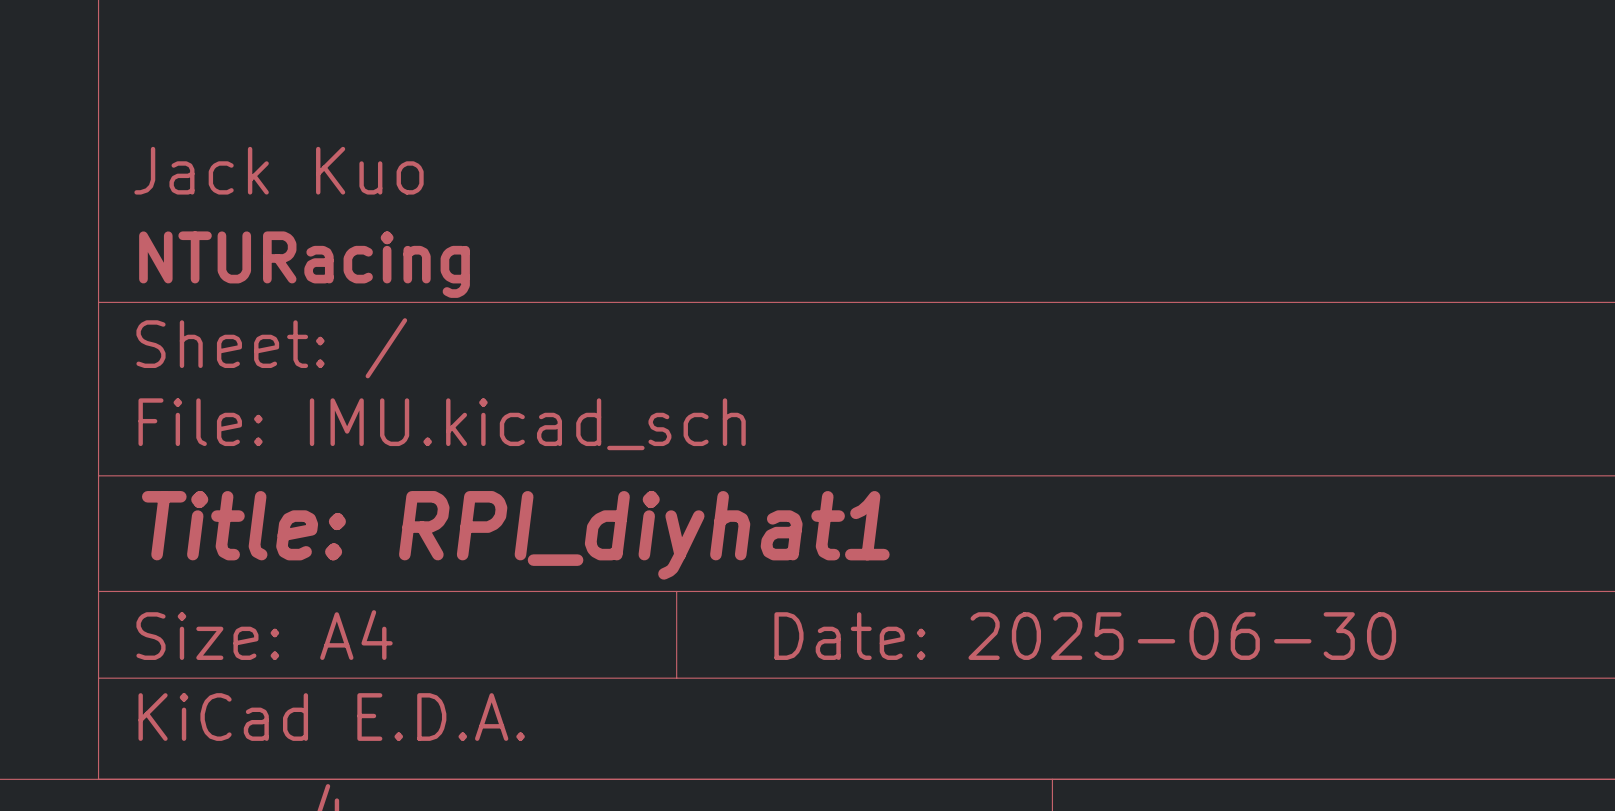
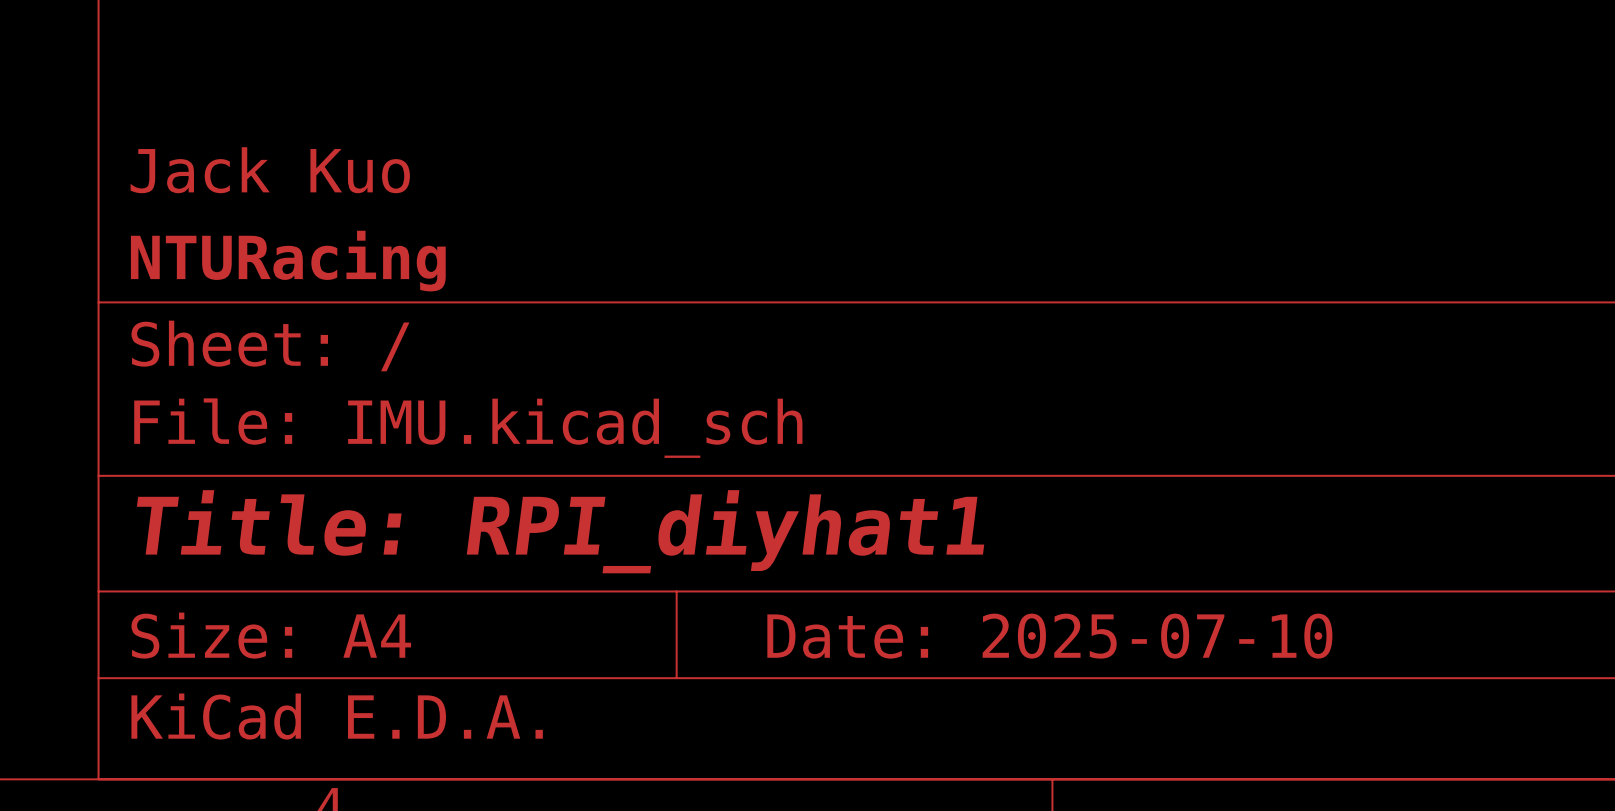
title block: Date: 2025-06-30 (1085, 636) -> Date: 2025-07-10 (1049, 636)

